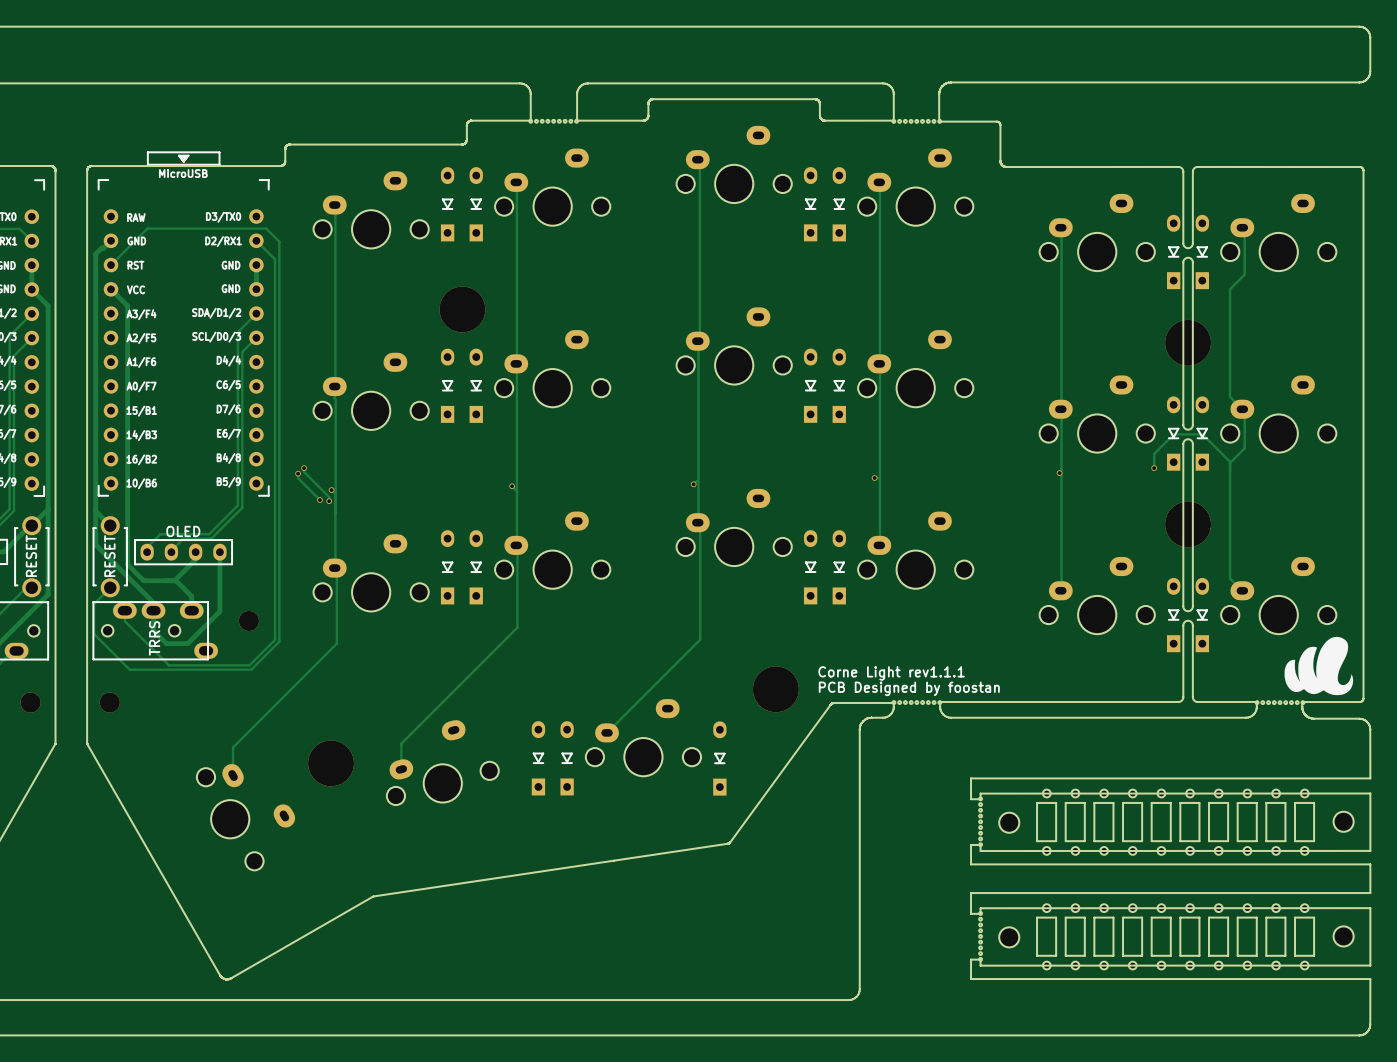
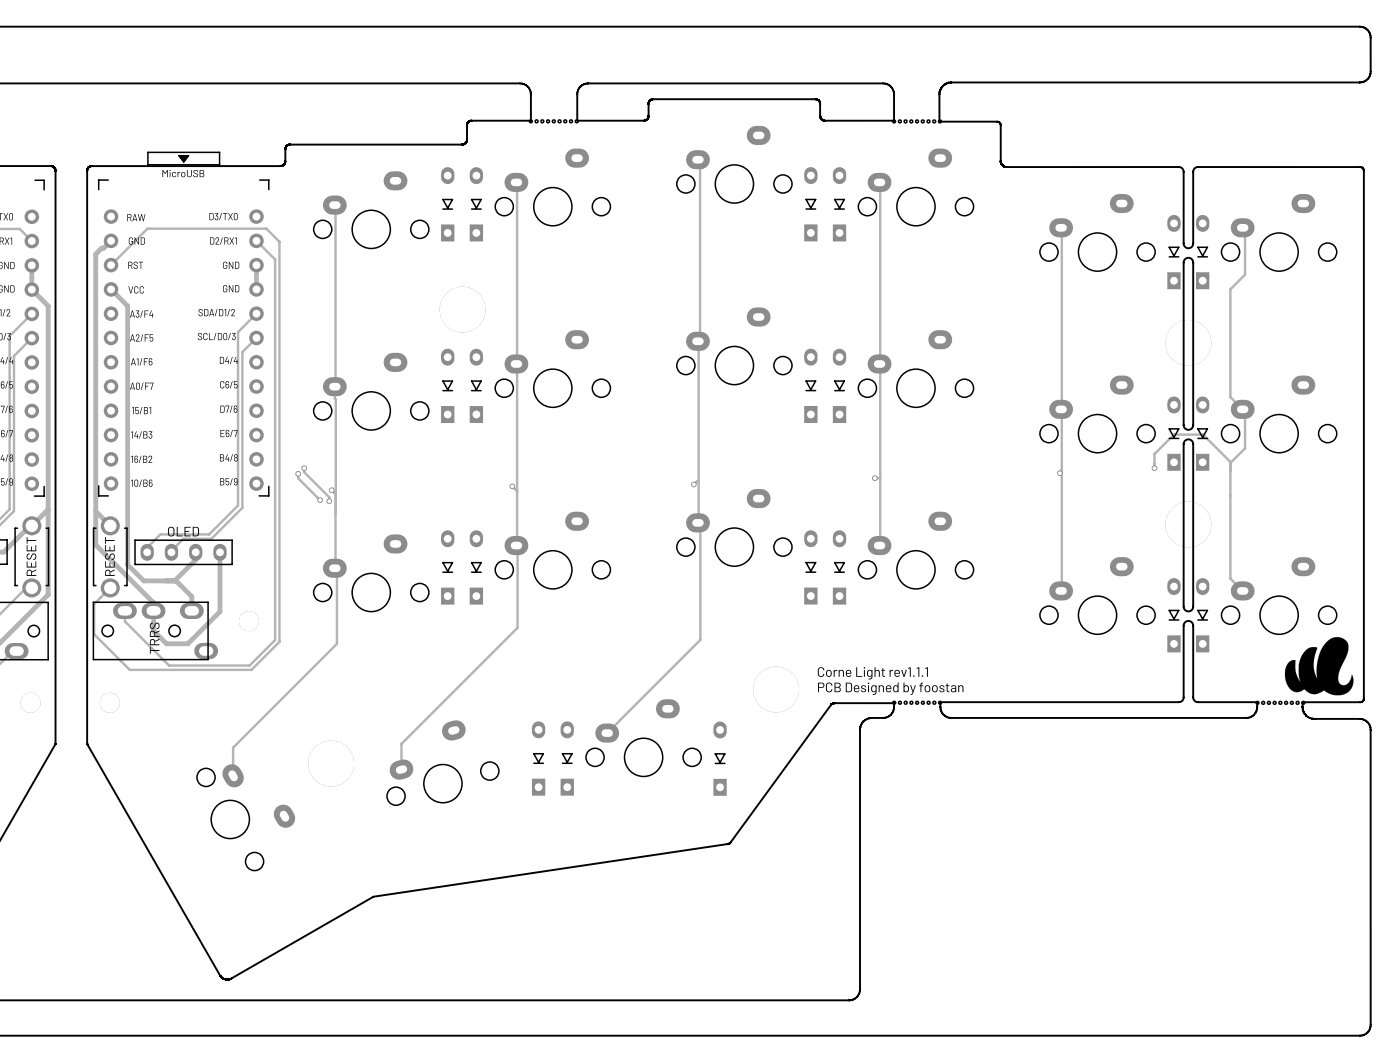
board edge: (1370, 729) (1370, 778) (971, 778) (971, 799) (980, 799) (980, 793) (1370, 793) (1370, 850) (980, 851) (980, 844) (971, 844) (971, 864) (1370, 864) (1370, 893) (971, 893) (971, 913) (980, 913) (980, 908) (1370, 908) (1370, 965) (980, 965) (980, 959) (971, 959) (971, 979) (1370, 979) (1370, 1024) -> (1370, 729) (1370, 1024)
part: (1046, 793) -> none
part: (1075, 793) -> none
part: (1104, 793) -> none
part: (1132, 793) -> none
part: (1161, 793) -> none
part: (1190, 793) -> none
part: (1218, 793) -> none
part: (1247, 793) -> none
part: (1276, 793) -> none
part: (1304, 793) -> none
board edge: (1037, 802) (1037, 841) (1056, 841) (1056, 802) (1037, 802) -> none
board edge: (1065, 802) (1065, 841) (1084, 841) (1084, 802) (1065, 802) -> none
board edge: (1094, 802) (1094, 841) (1113, 841) (1113, 802) (1094, 802) -> none
board edge: (1123, 802) (1123, 841) (1142, 841) (1142, 802) (1123, 802) -> none
board edge: (1151, 802) (1151, 841) (1170, 841) (1170, 802) (1151, 802) -> none
board edge: (1180, 802) (1199, 802) (1199, 841) (1180, 841) (1180, 802) -> none
board edge: (1209, 802) (1228, 802) (1228, 841) (1209, 841) (1209, 802) -> none
board edge: (1237, 802) (1237, 841) (1256, 841) (1256, 802) (1237, 802) -> none
board edge: (1266, 802) (1266, 841) (1285, 841) (1285, 802) (1266, 802) -> none
board edge: (1294, 802) (1294, 841) (1314, 841) (1314, 802) (1294, 802) -> none
part: (980, 821) -> none
part: (1343, 821) -> none
part: (1009, 822) -> none
part: (1046, 850) -> none
part: (1075, 850) -> none
part: (1104, 850) -> none
part: (1132, 850) -> none
part: (1161, 850) -> none
part: (1190, 850) -> none
part: (1218, 850) -> none
part: (1247, 850) -> none
part: (1276, 850) -> none
part: (1304, 850) -> none
part: (1046, 908) -> none
part: (1075, 908) -> none
part: (1104, 908) -> none
part: (1132, 908) -> none
part: (1161, 908) -> none
part: (1190, 908) -> none
part: (1218, 908) -> none
part: (1247, 908) -> none
part: (1276, 908) -> none
part: (1304, 908) -> none
board edge: (1037, 917) (1056, 917) (1056, 955) (1037, 955) (1037, 917) -> none
board edge: (1065, 917) (1084, 917) (1084, 955) (1065, 955) (1065, 917) -> none
board edge: (1094, 917) (1094, 955) (1113, 955) (1113, 917) (1094, 917) -> none
board edge: (1123, 917) (1123, 955) (1142, 955) (1142, 917) (1123, 917) -> none
board edge: (1151, 917) (1151, 955) (1170, 955) (1170, 917) (1151, 917) -> none
board edge: (1180, 917) (1199, 917) (1199, 955) (1180, 955) (1180, 917) -> none
board edge: (1209, 917) (1228, 917) (1228, 955) (1209, 955) (1209, 917) -> none
board edge: (1237, 917) (1237, 955) (1256, 955) (1256, 917) (1237, 917) -> none
board edge: (1266, 917) (1285, 917) (1285, 955) (1266, 955) (1266, 917) -> none
board edge: (1294, 917) (1294, 955) (1314, 955) (1314, 917) (1294, 917) -> none
part: (980, 936) -> none
part: (1343, 936) -> none
part: (1009, 937) -> none
part: (1046, 965) -> none
part: (1075, 965) -> none
part: (1104, 965) -> none
part: (1132, 965) -> none
part: (1161, 965) -> none
part: (1190, 965) -> none
part: (1218, 965) -> none
part: (1247, 965) -> none
part: (1276, 965) -> none
part: (1304, 965) -> none

